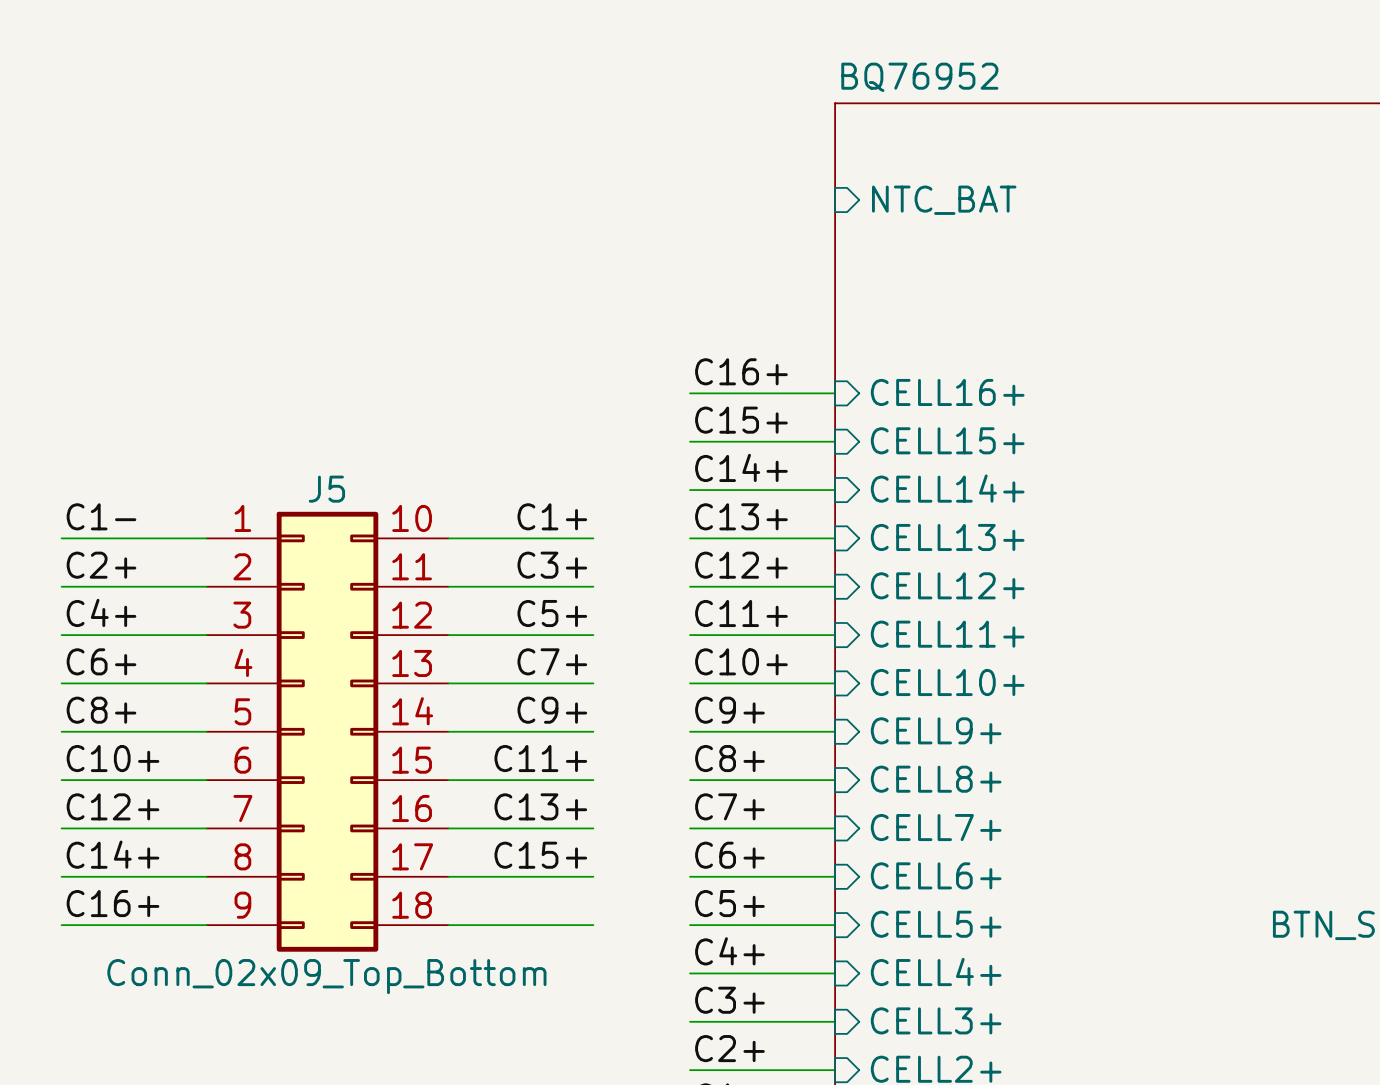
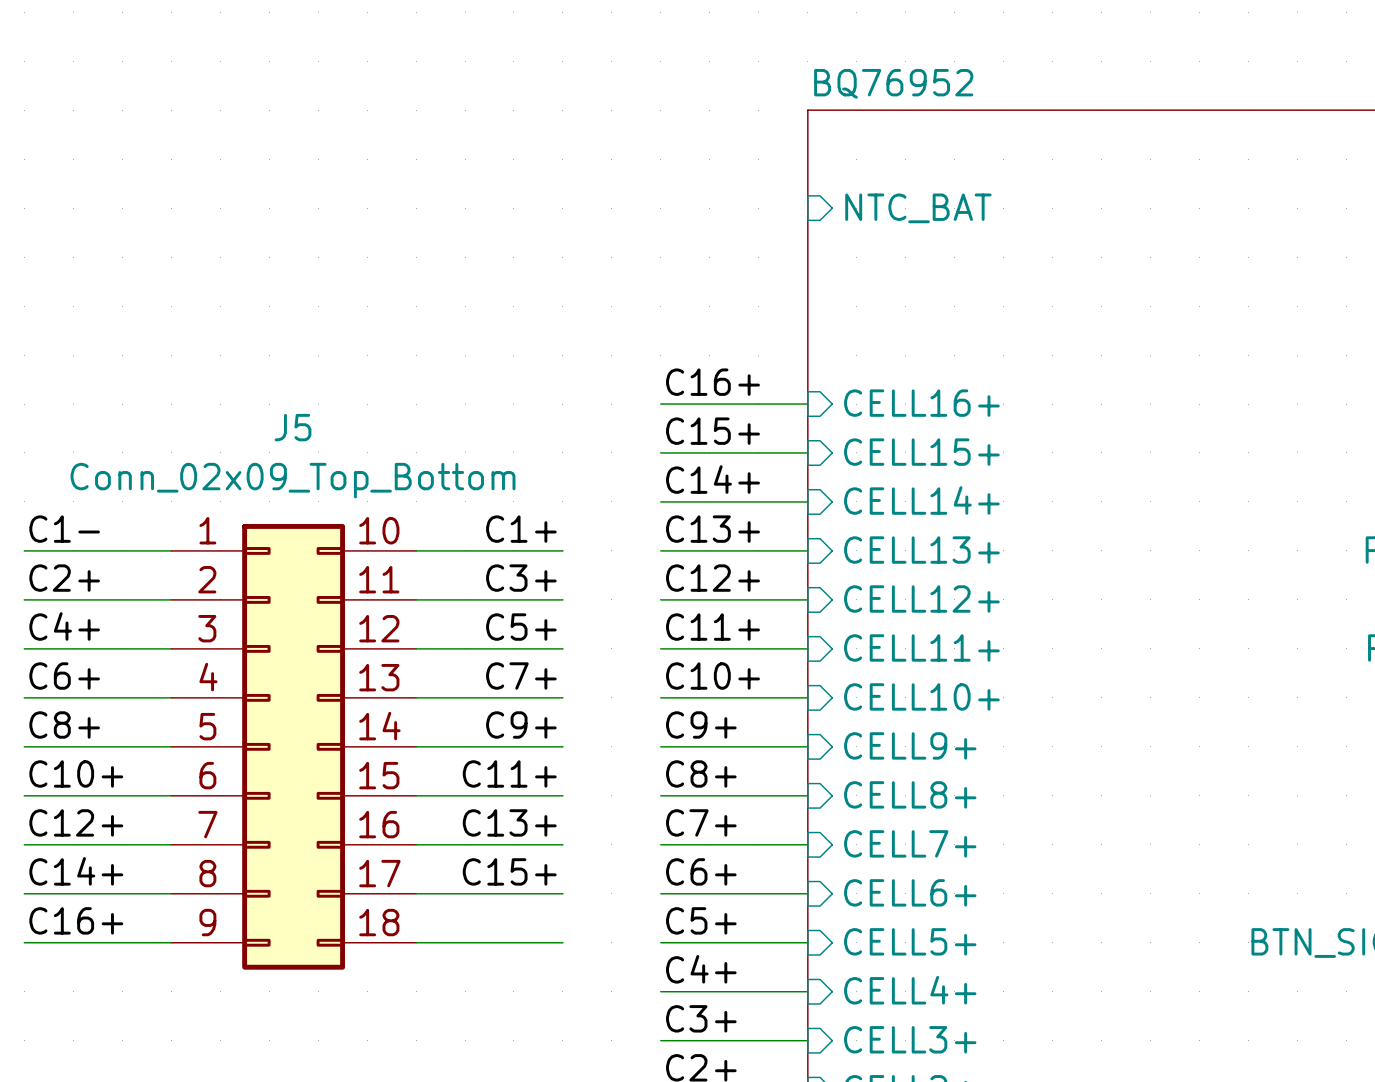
J5 name position: J5 (326, 489) -> J5 (293, 427)
J5 value position: Conn_02x09_Top_Bottom (326, 976) -> Conn_02x09_Top_Bottom (293, 480)

